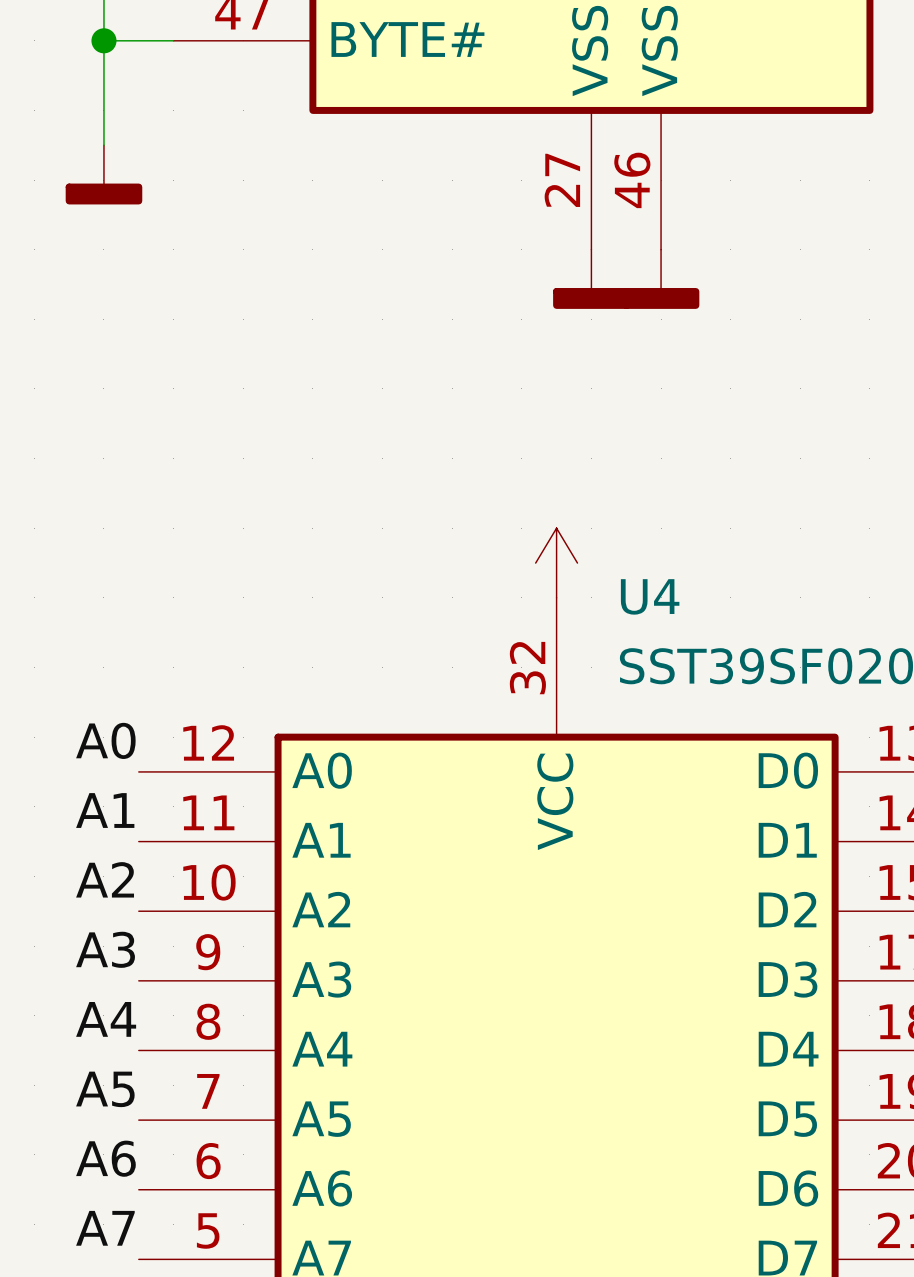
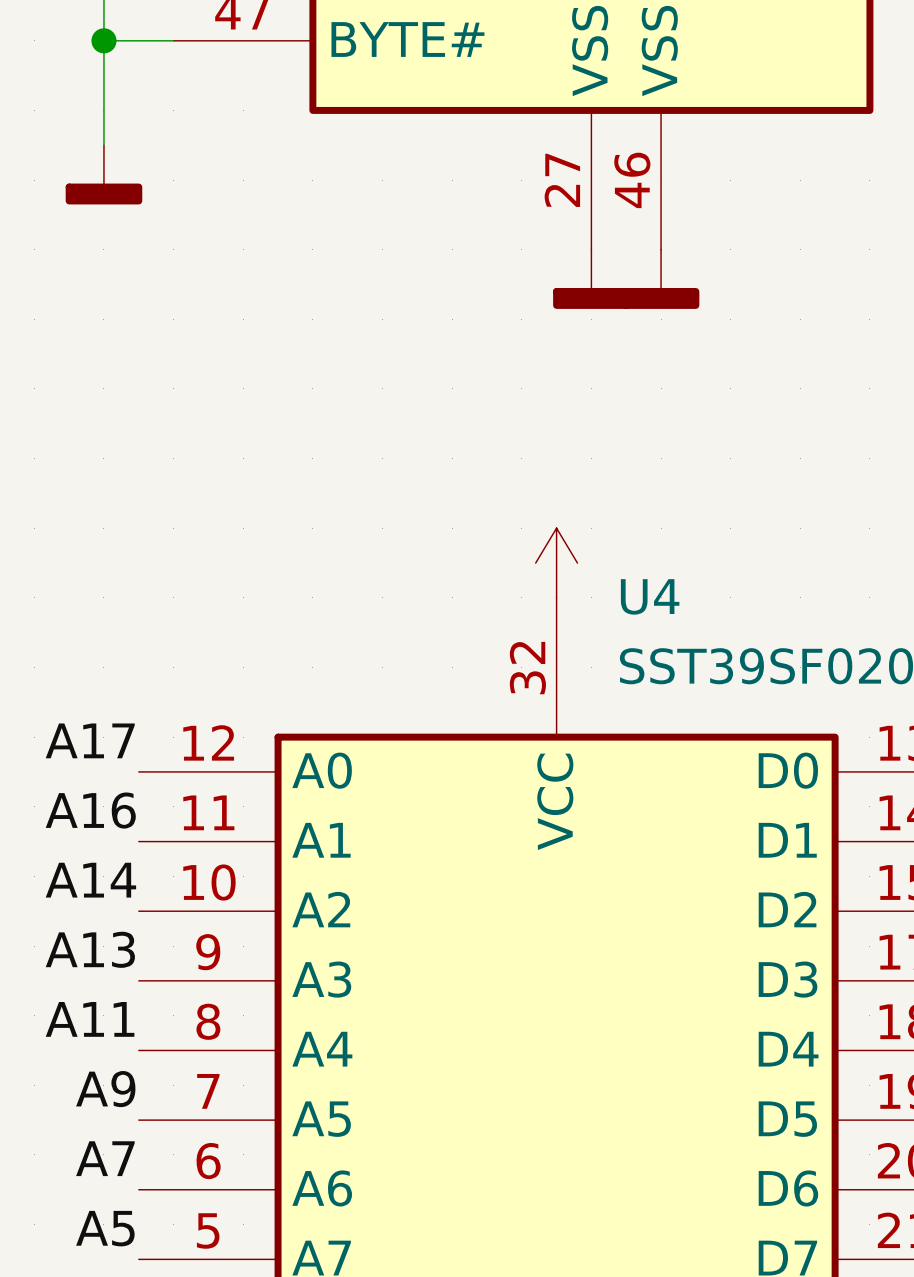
label: A0 (105, 740) -> A17 (90, 740)
label: A1 (105, 810) -> A16 (90, 810)
label: A2 (105, 879) -> A14 (90, 880)
label: A3 (105, 949) -> A13 (90, 949)
label: A4 (106, 1019) -> A11 (90, 1019)
label: A5 (105, 1089) -> A9 (105, 1089)
label: A6 (105, 1158) -> A7 (105, 1158)
label: A7 (105, 1228) -> A5 (105, 1228)

